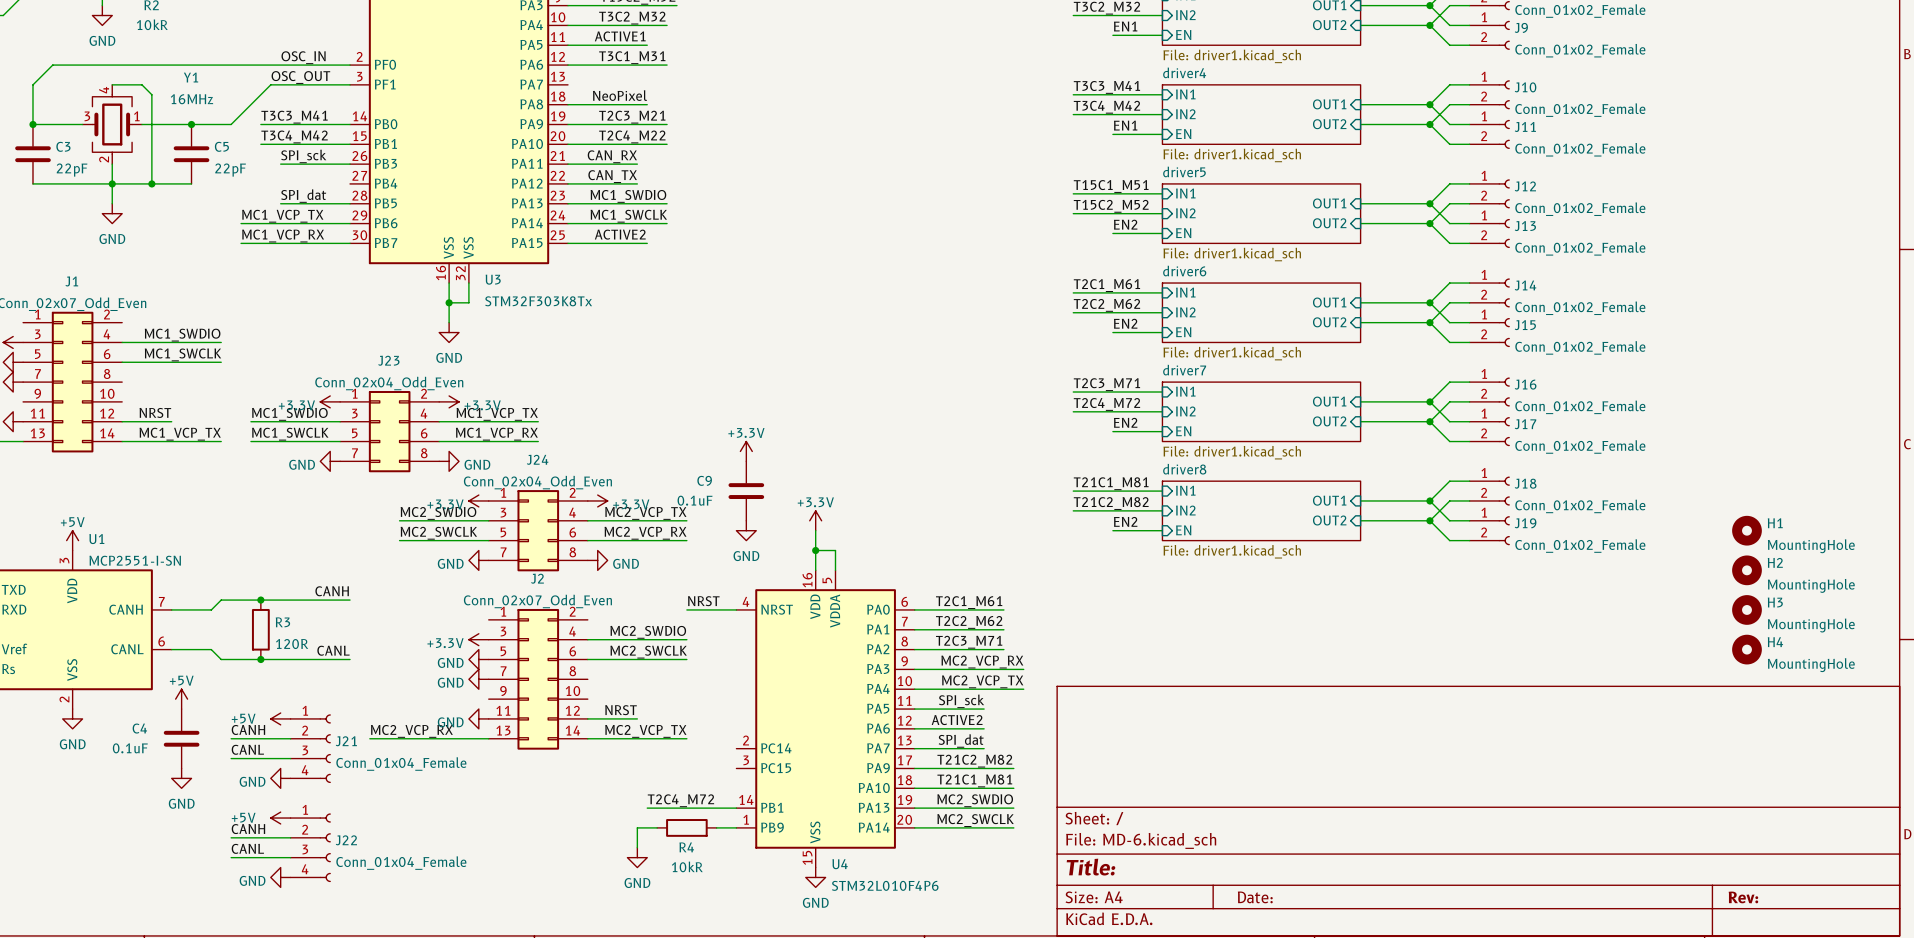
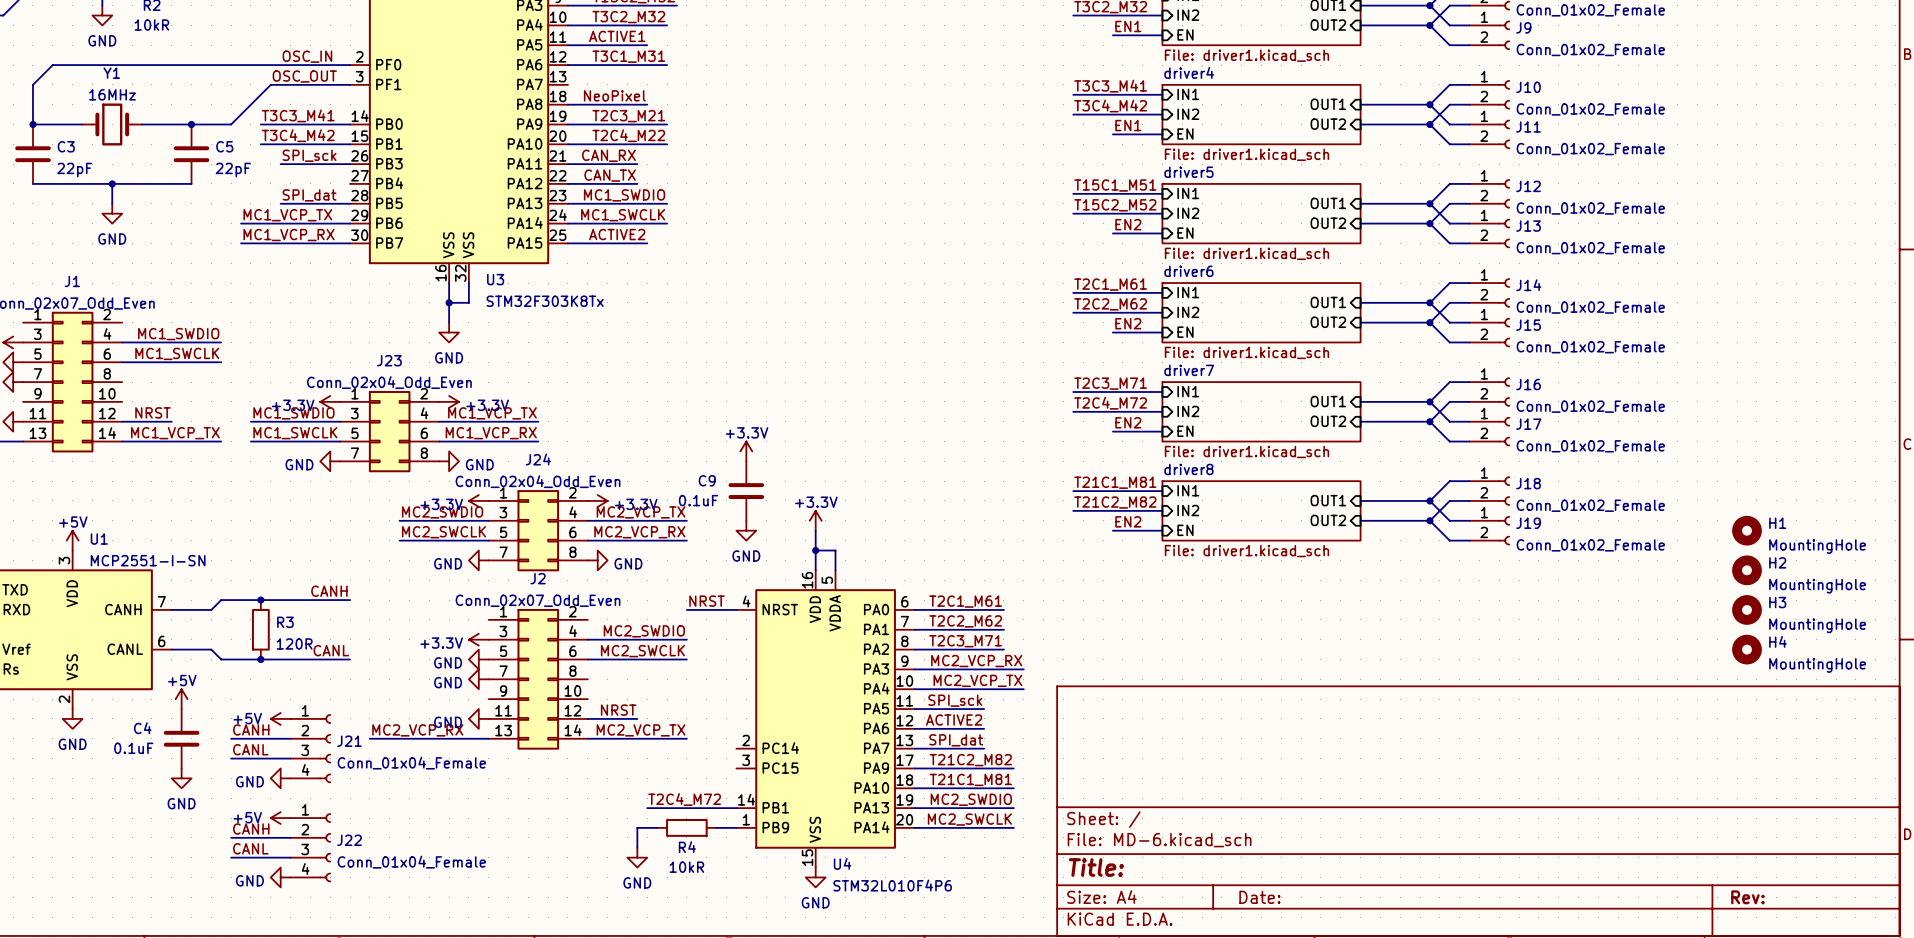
Y1 name position: Y1 (191, 77) -> Y1 (111, 73)
Y1 symbol: [82, 84, 142, 165] -> [82, 103, 142, 146]
wire: (112, 84) (141, 84) (151, 94) (151, 183) -> none
Y1 value position: 16MHz (191, 99) -> 16MHz (112, 94)
wire: (112, 164) (112, 183) -> none
junction: (151, 183) -> none

